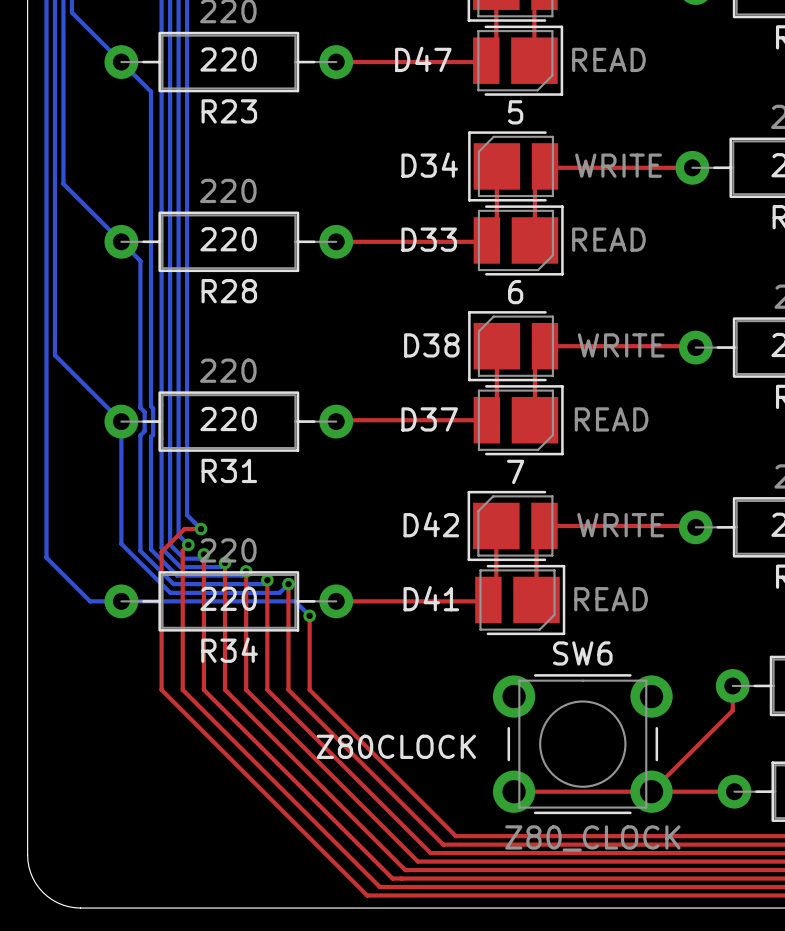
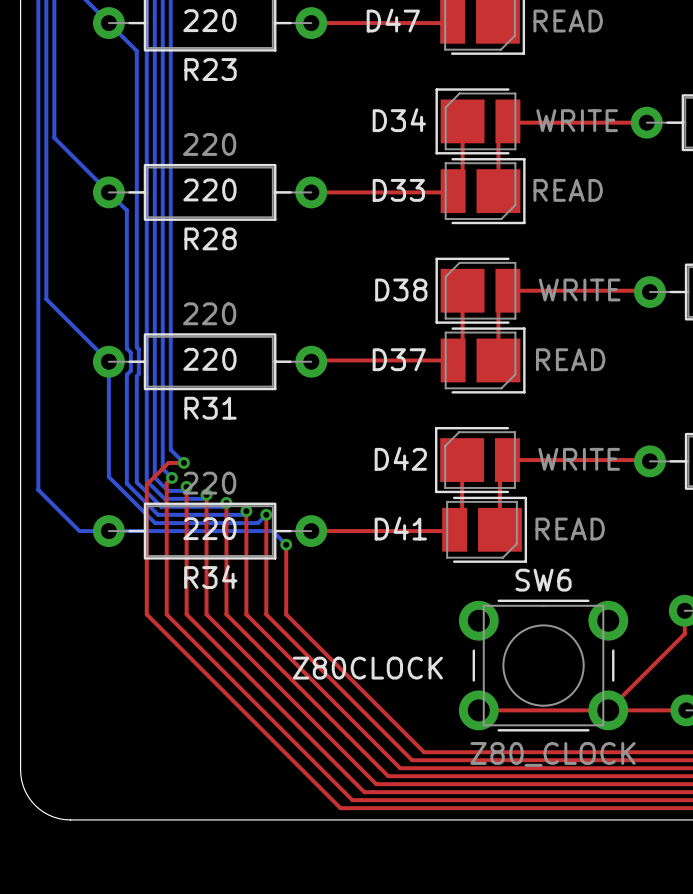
text: 5 (515, 112) -> none
text: 6 (515, 292) -> none
text: 7 (515, 471) -> none

